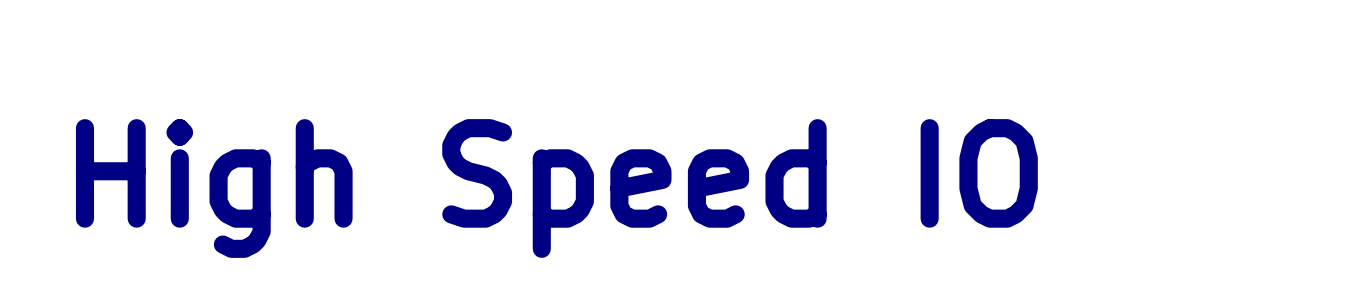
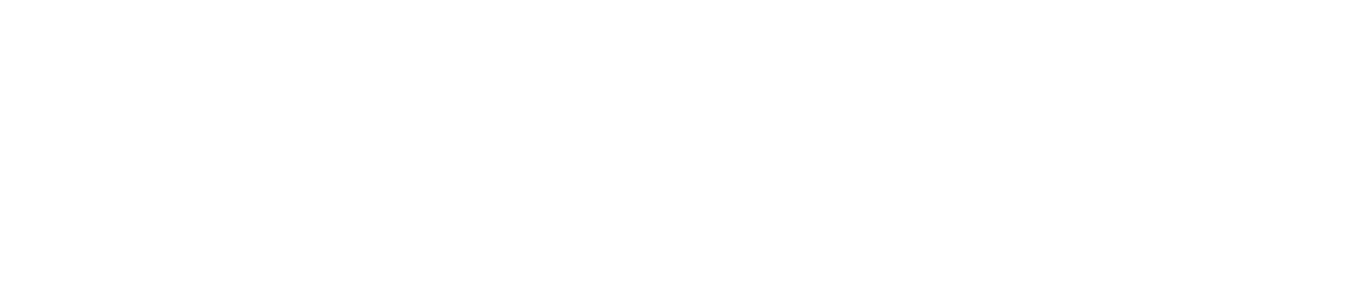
text: High Speed IO (556, 188) -> none

